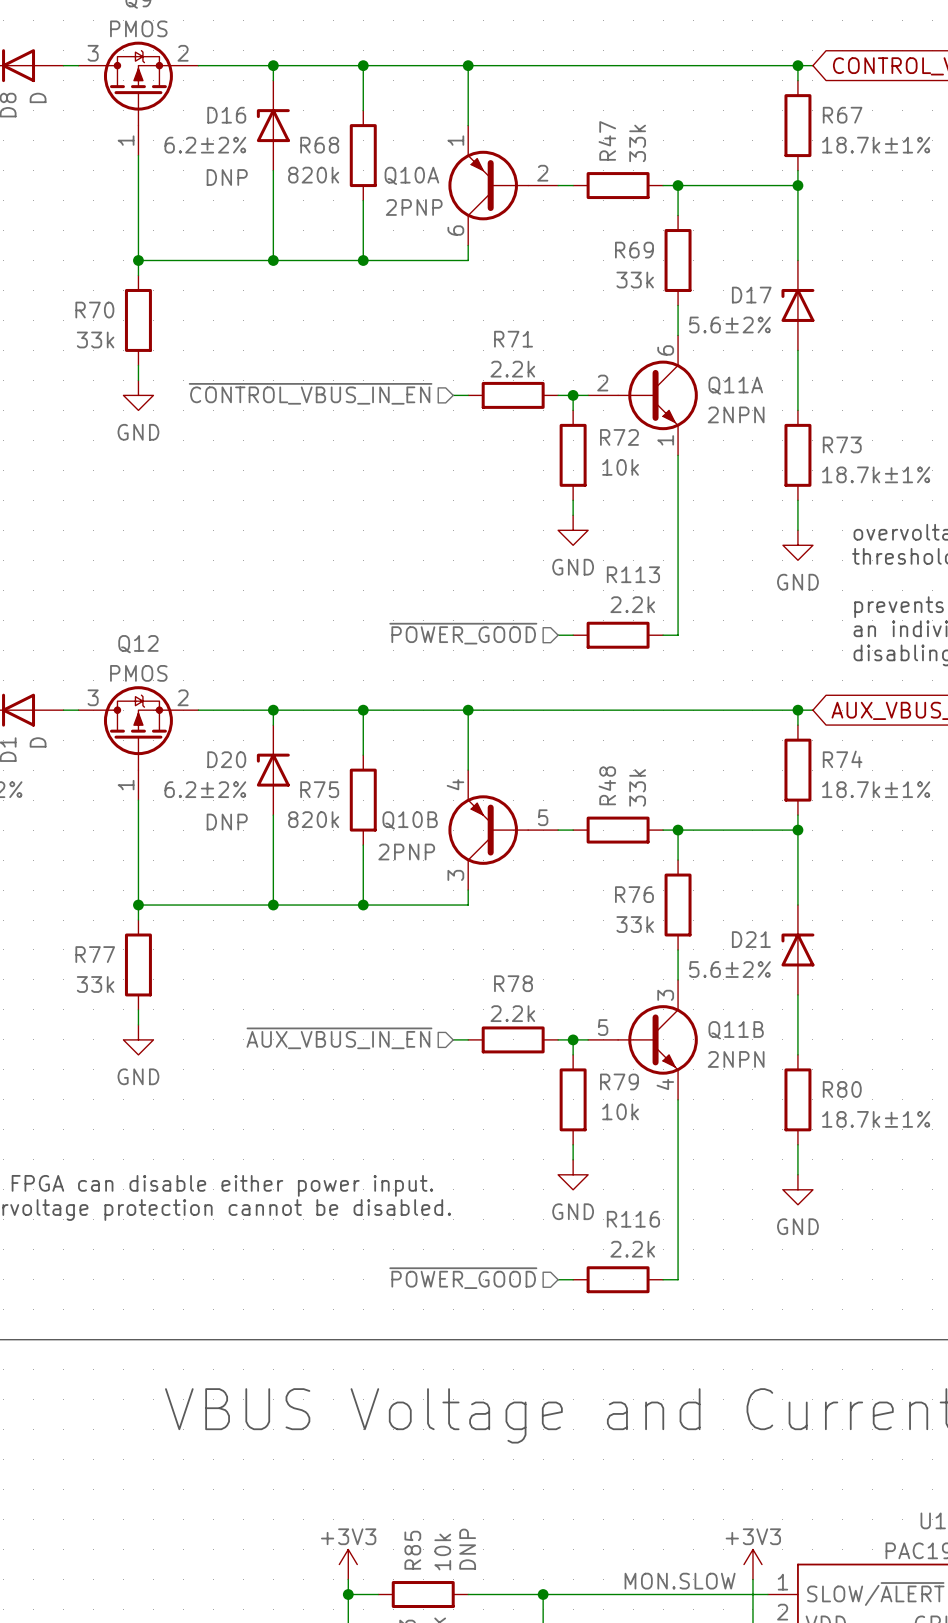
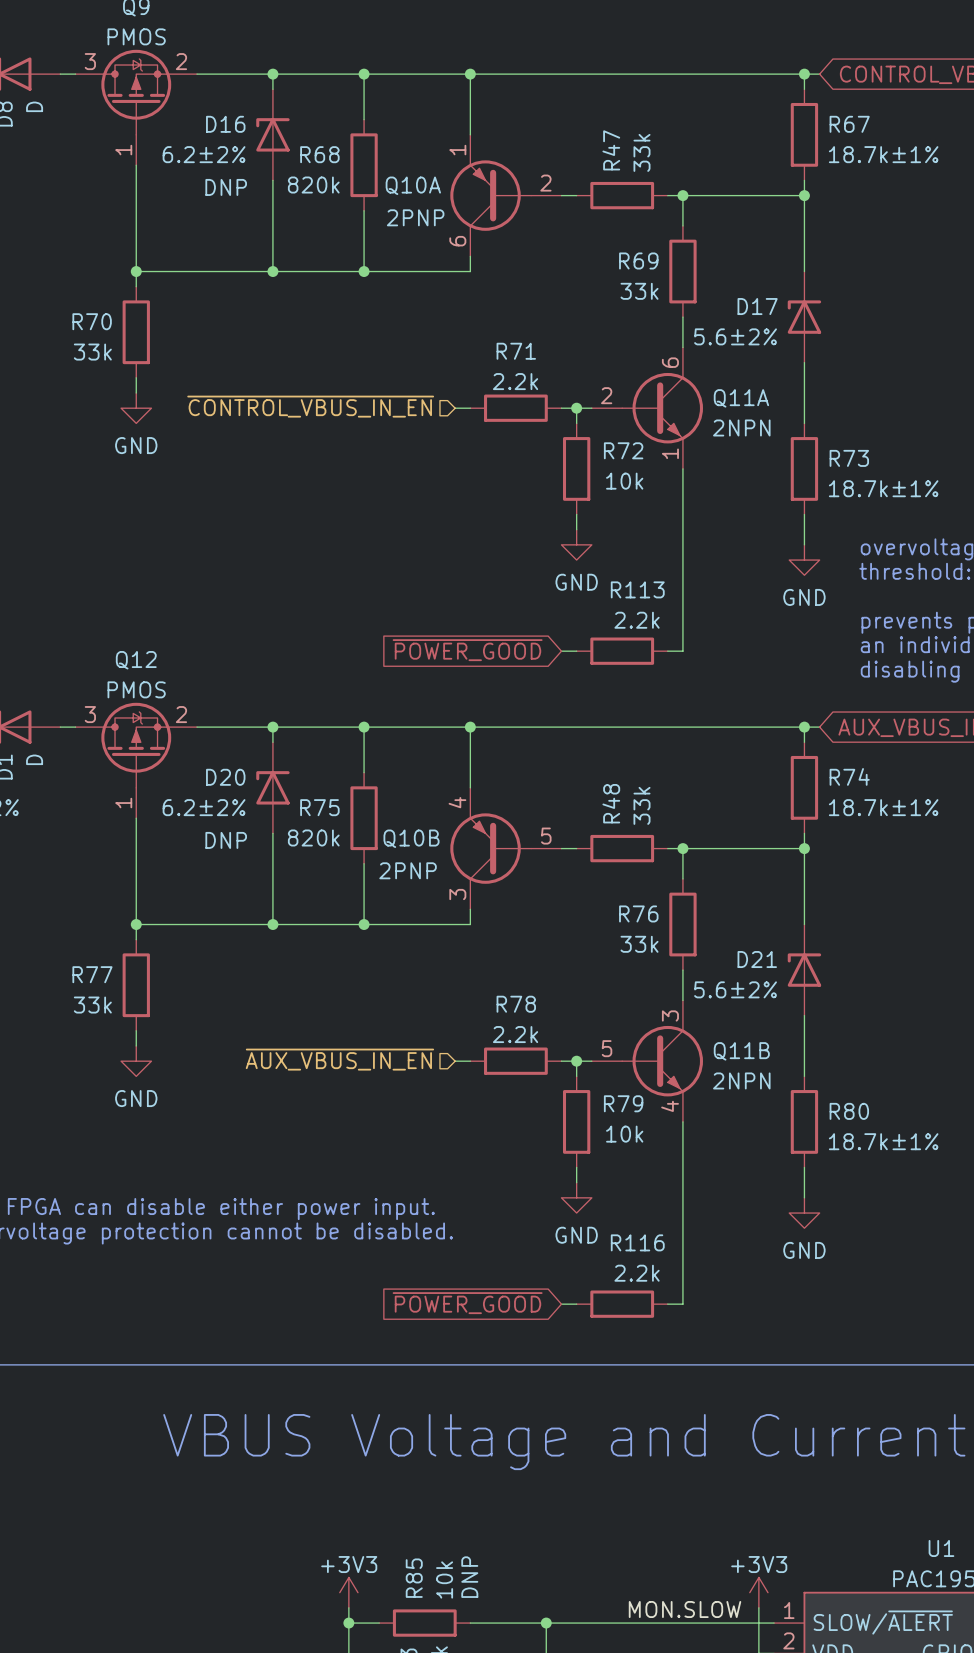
hierarchical label: ~{POWER_GOOD} (463, 633) -> none
global label: none -> ~{POWER_GOOD} (467, 650)
hierarchical label: ~{POWER_GOOD} (463, 1278) -> none
global label: none -> ~{POWER_GOOD} (467, 1303)

